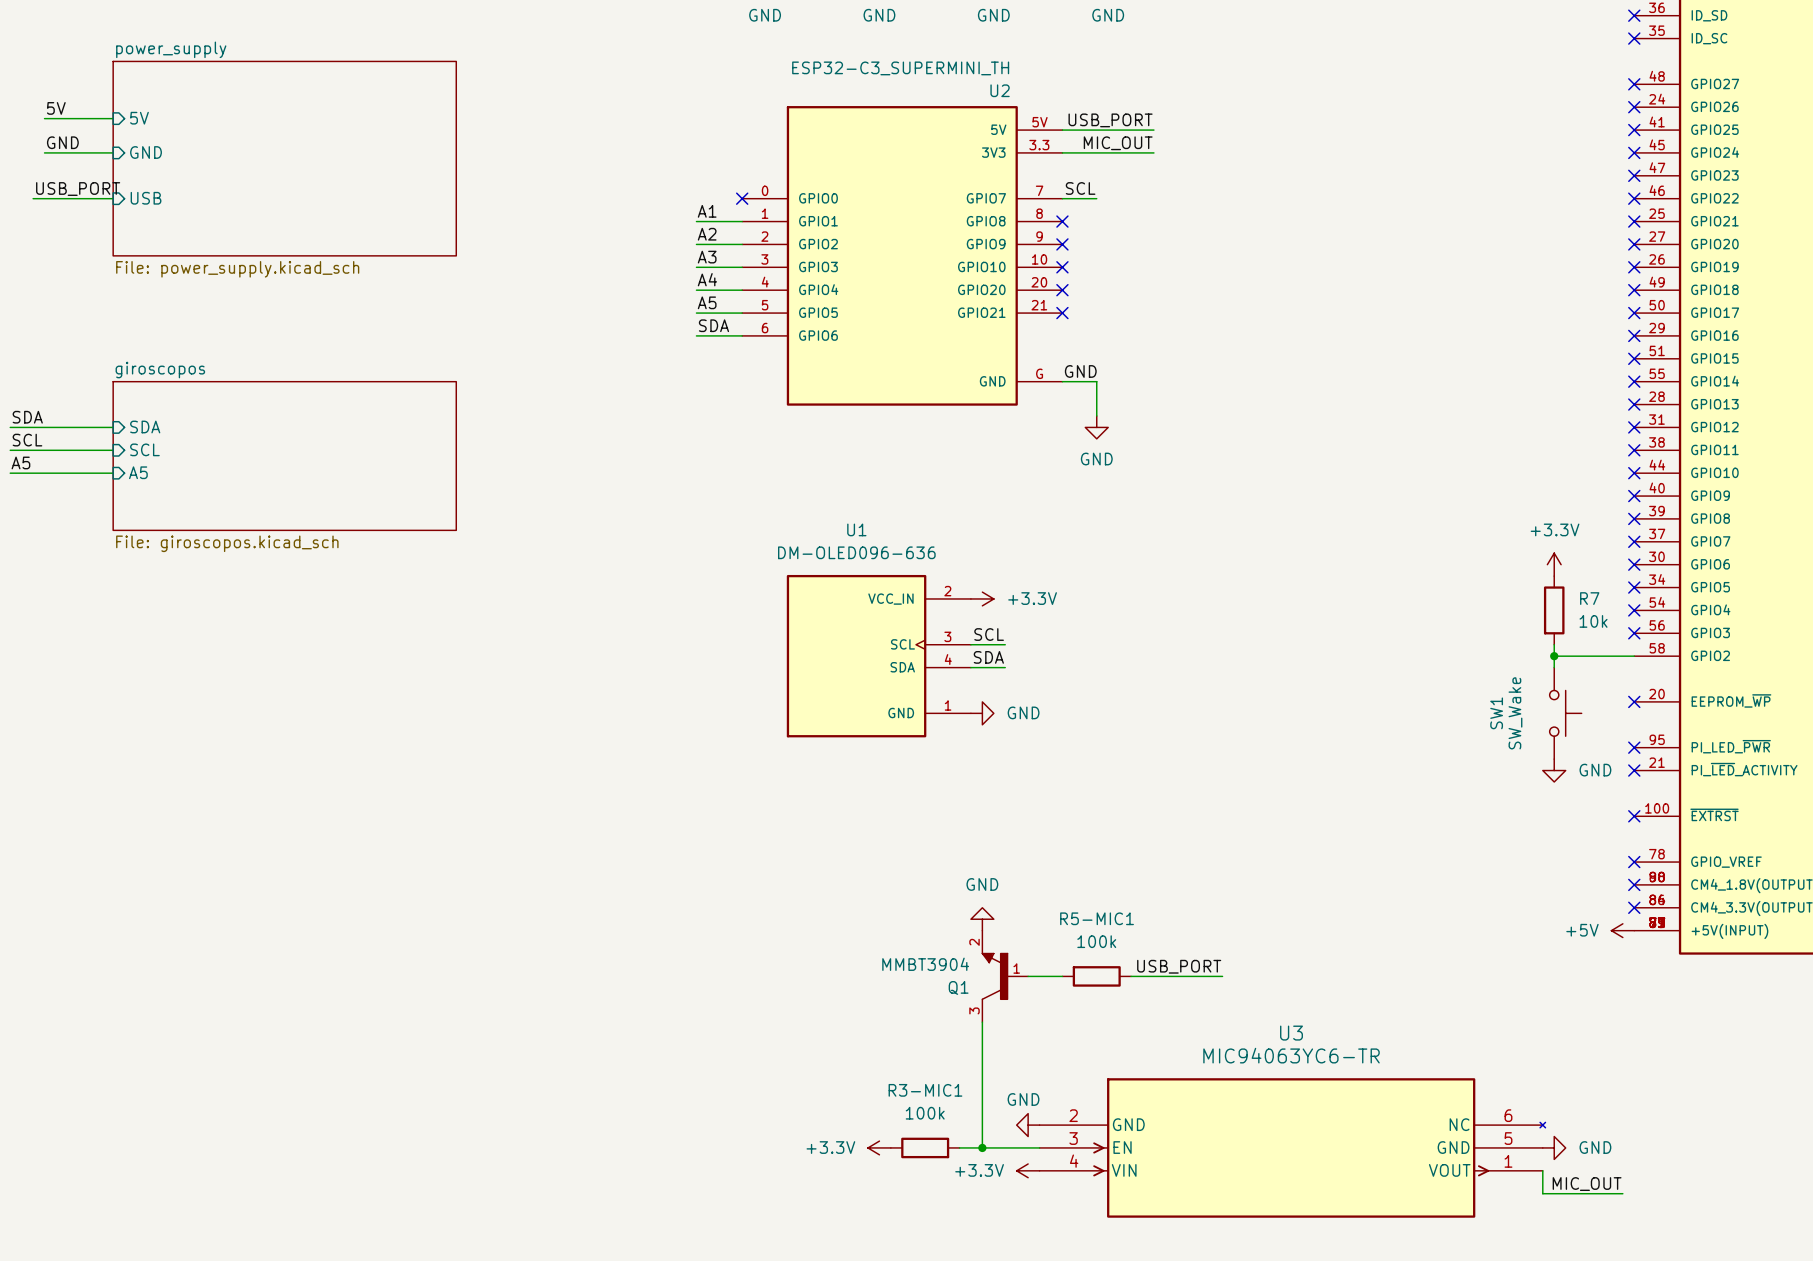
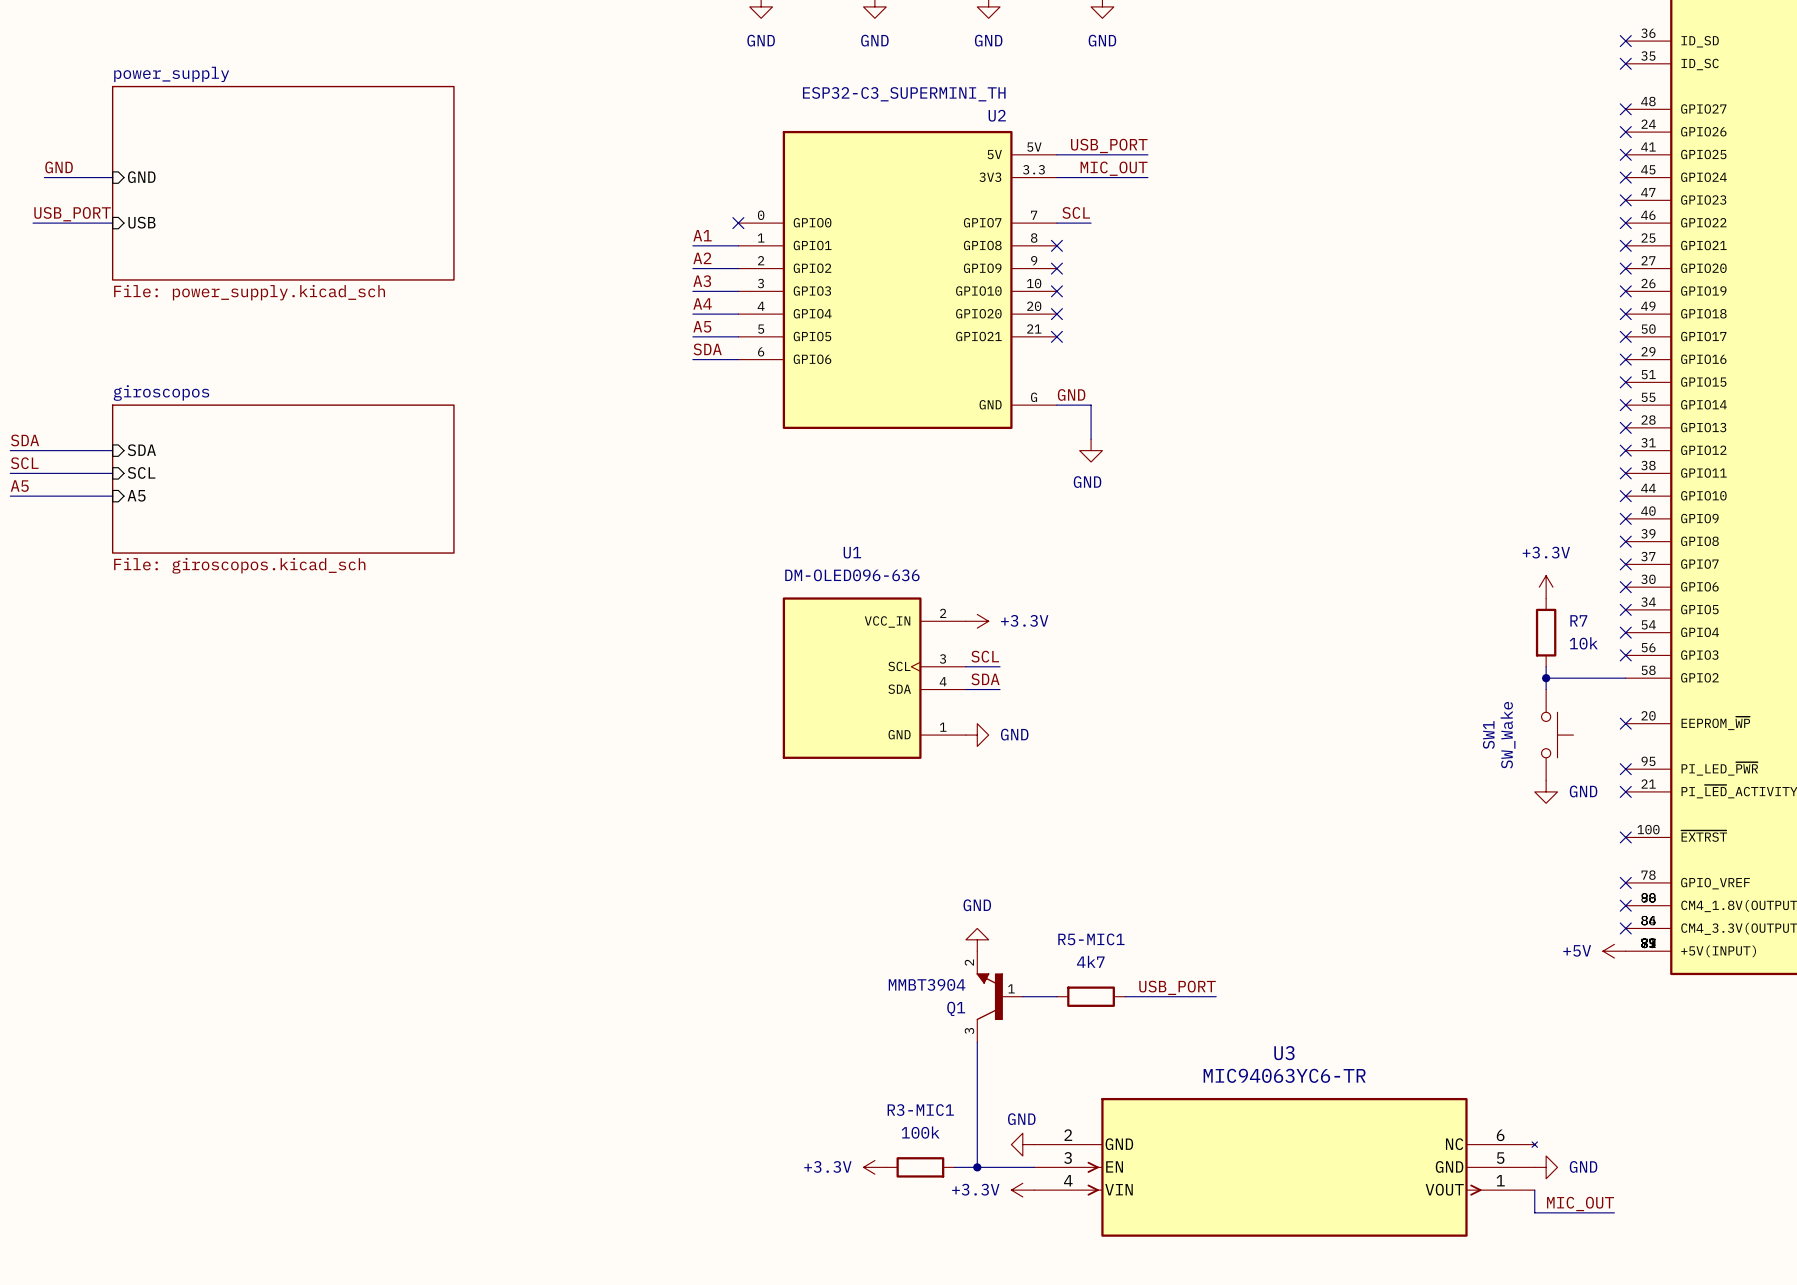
label: 5V (56, 108) -> none
wire: (44, 118) (113, 118) -> none
sheet pin: 5V (139, 118) -> none
R5-MIC1 value: 100k (1096, 941) -> 4k7 (1090, 961)

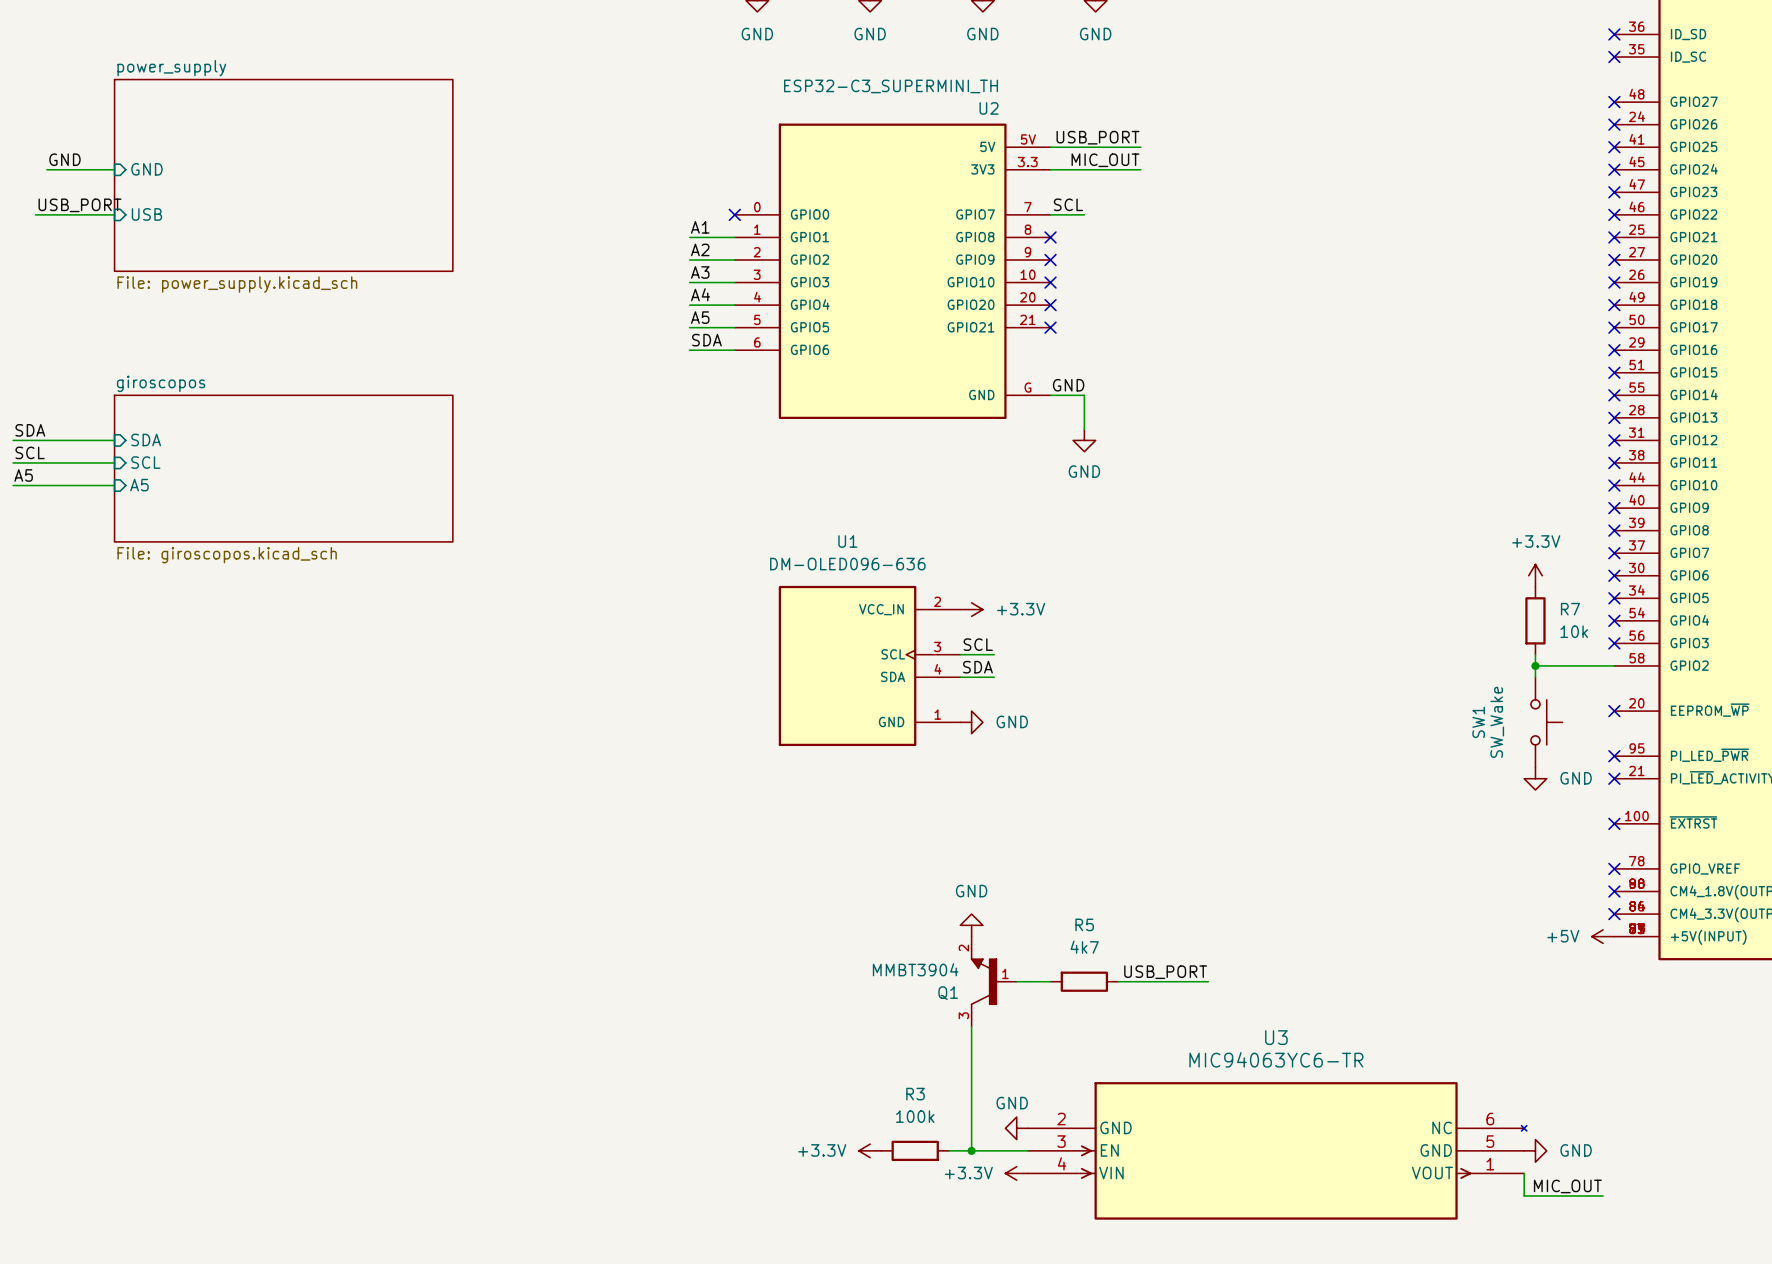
R5-MIC1 name: R5-MIC1 (1091, 939) -> R5 (1084, 924)
R3-MIC1 name: R3-MIC1 (920, 1110) -> R3 (915, 1094)

